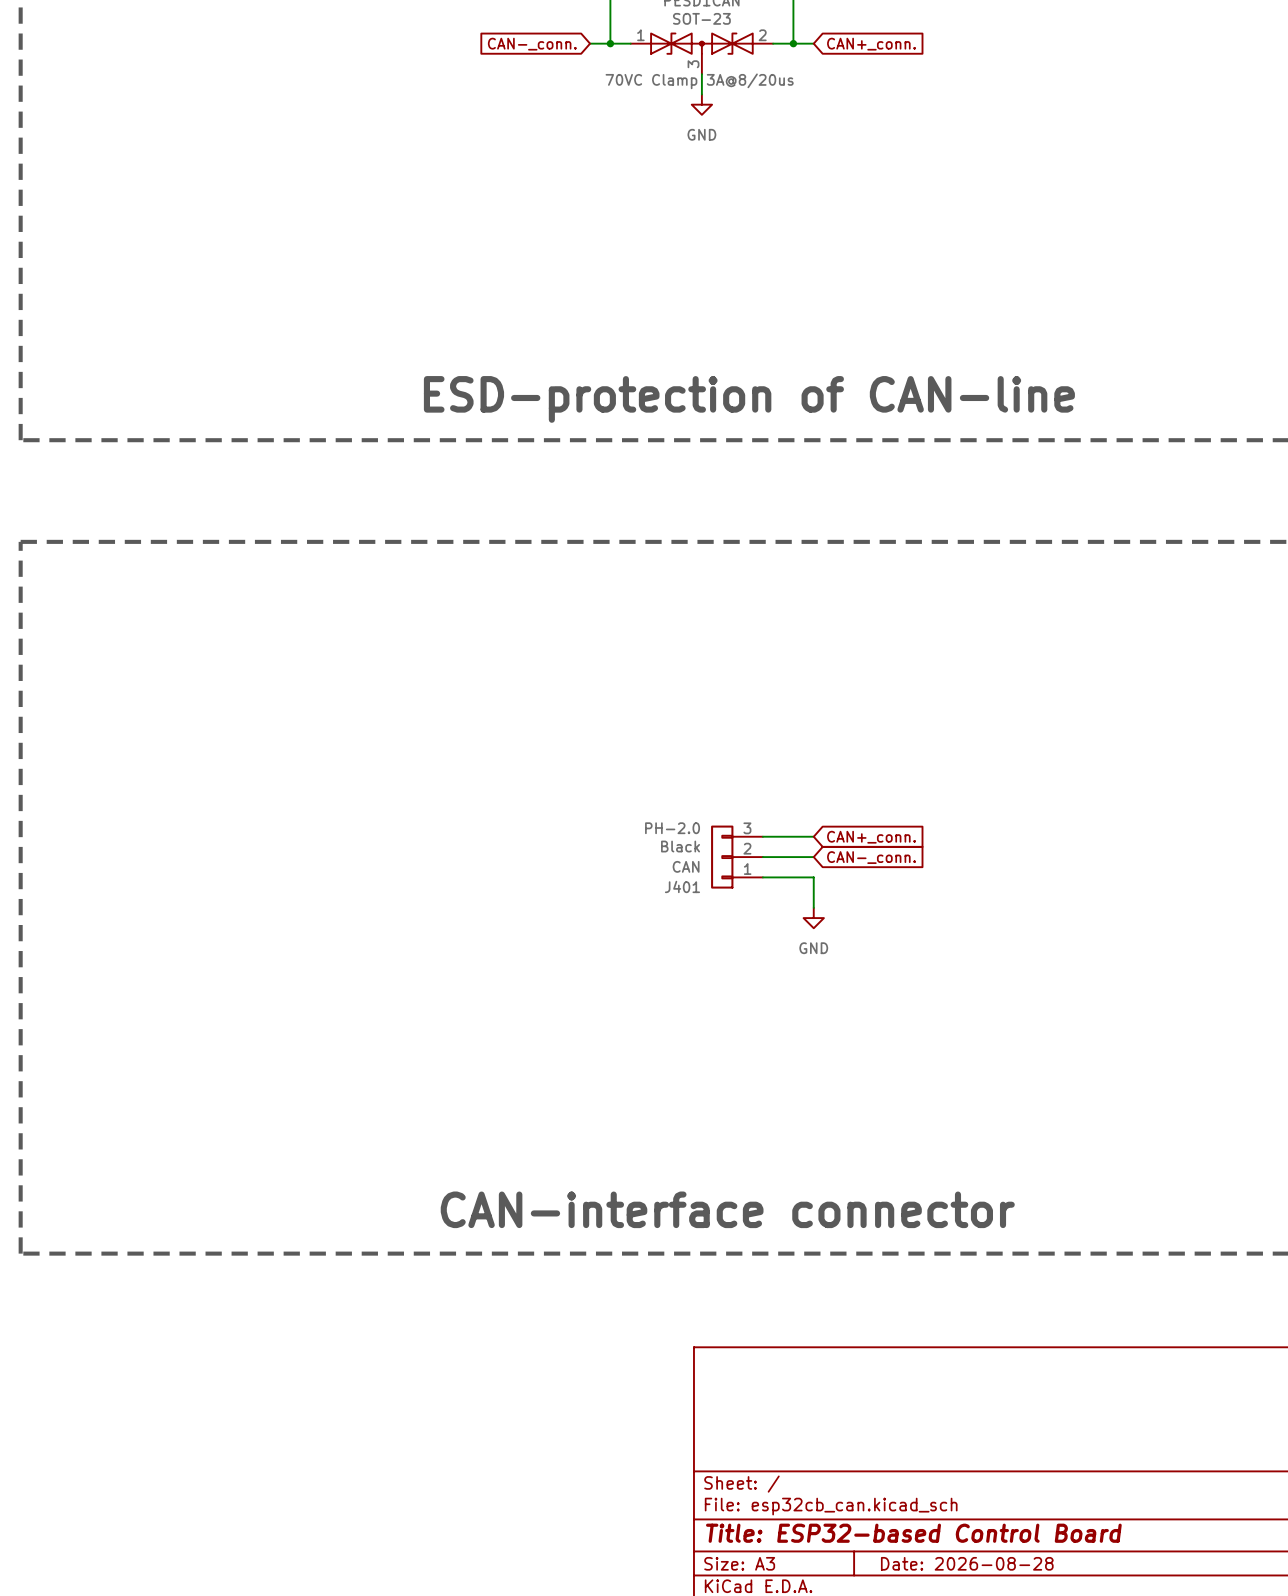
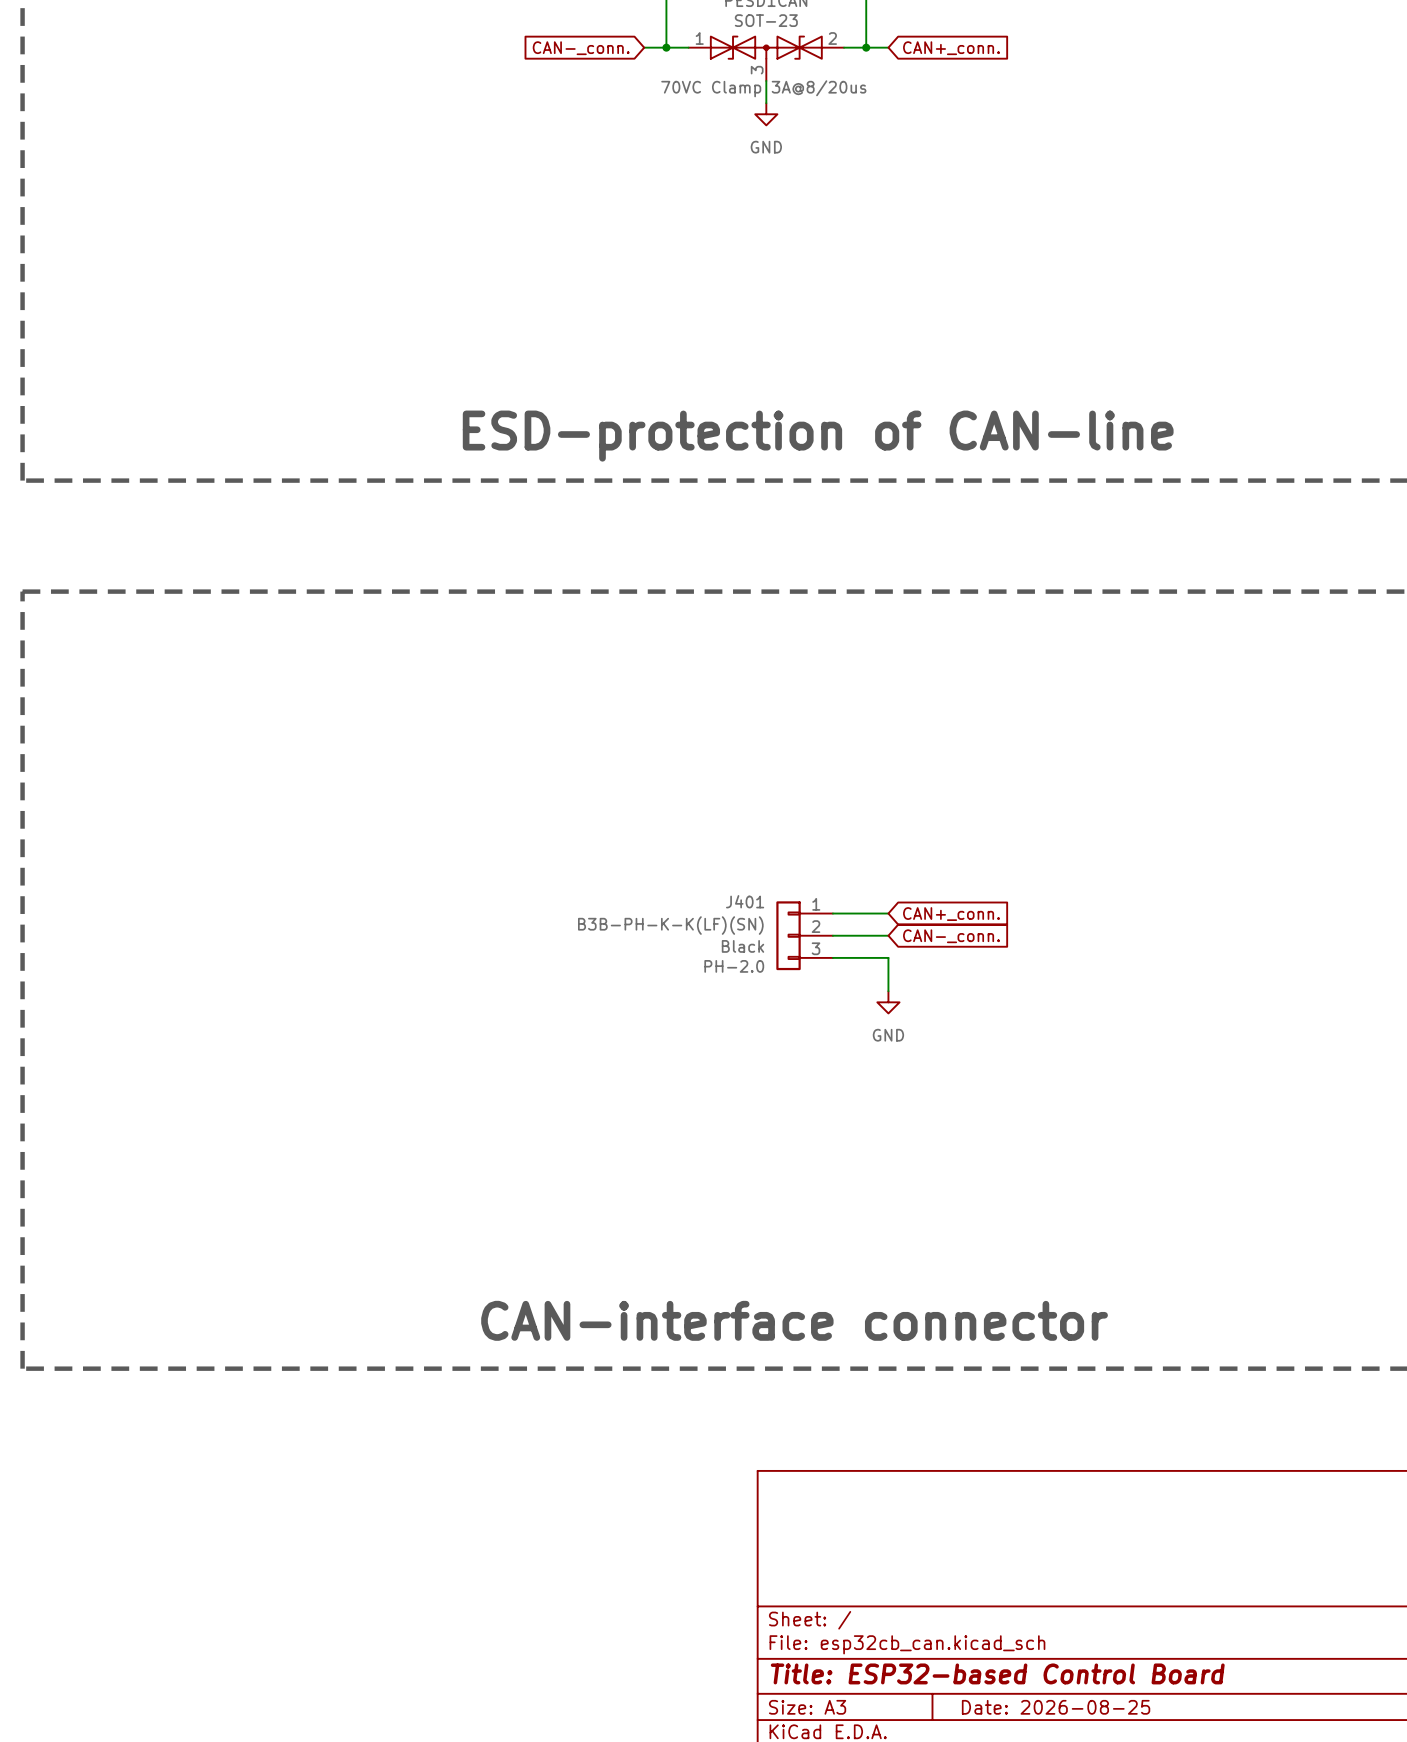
J401 flip: as is (722, 857) -> up-down (788, 935)
J401 value: CAN (686, 866) -> B3B-PH-K-K(LF)(SN) (670, 925)
title block: Date: 2026-08-28 (967, 1563) -> Date: 2026-08-25 (1056, 1707)

